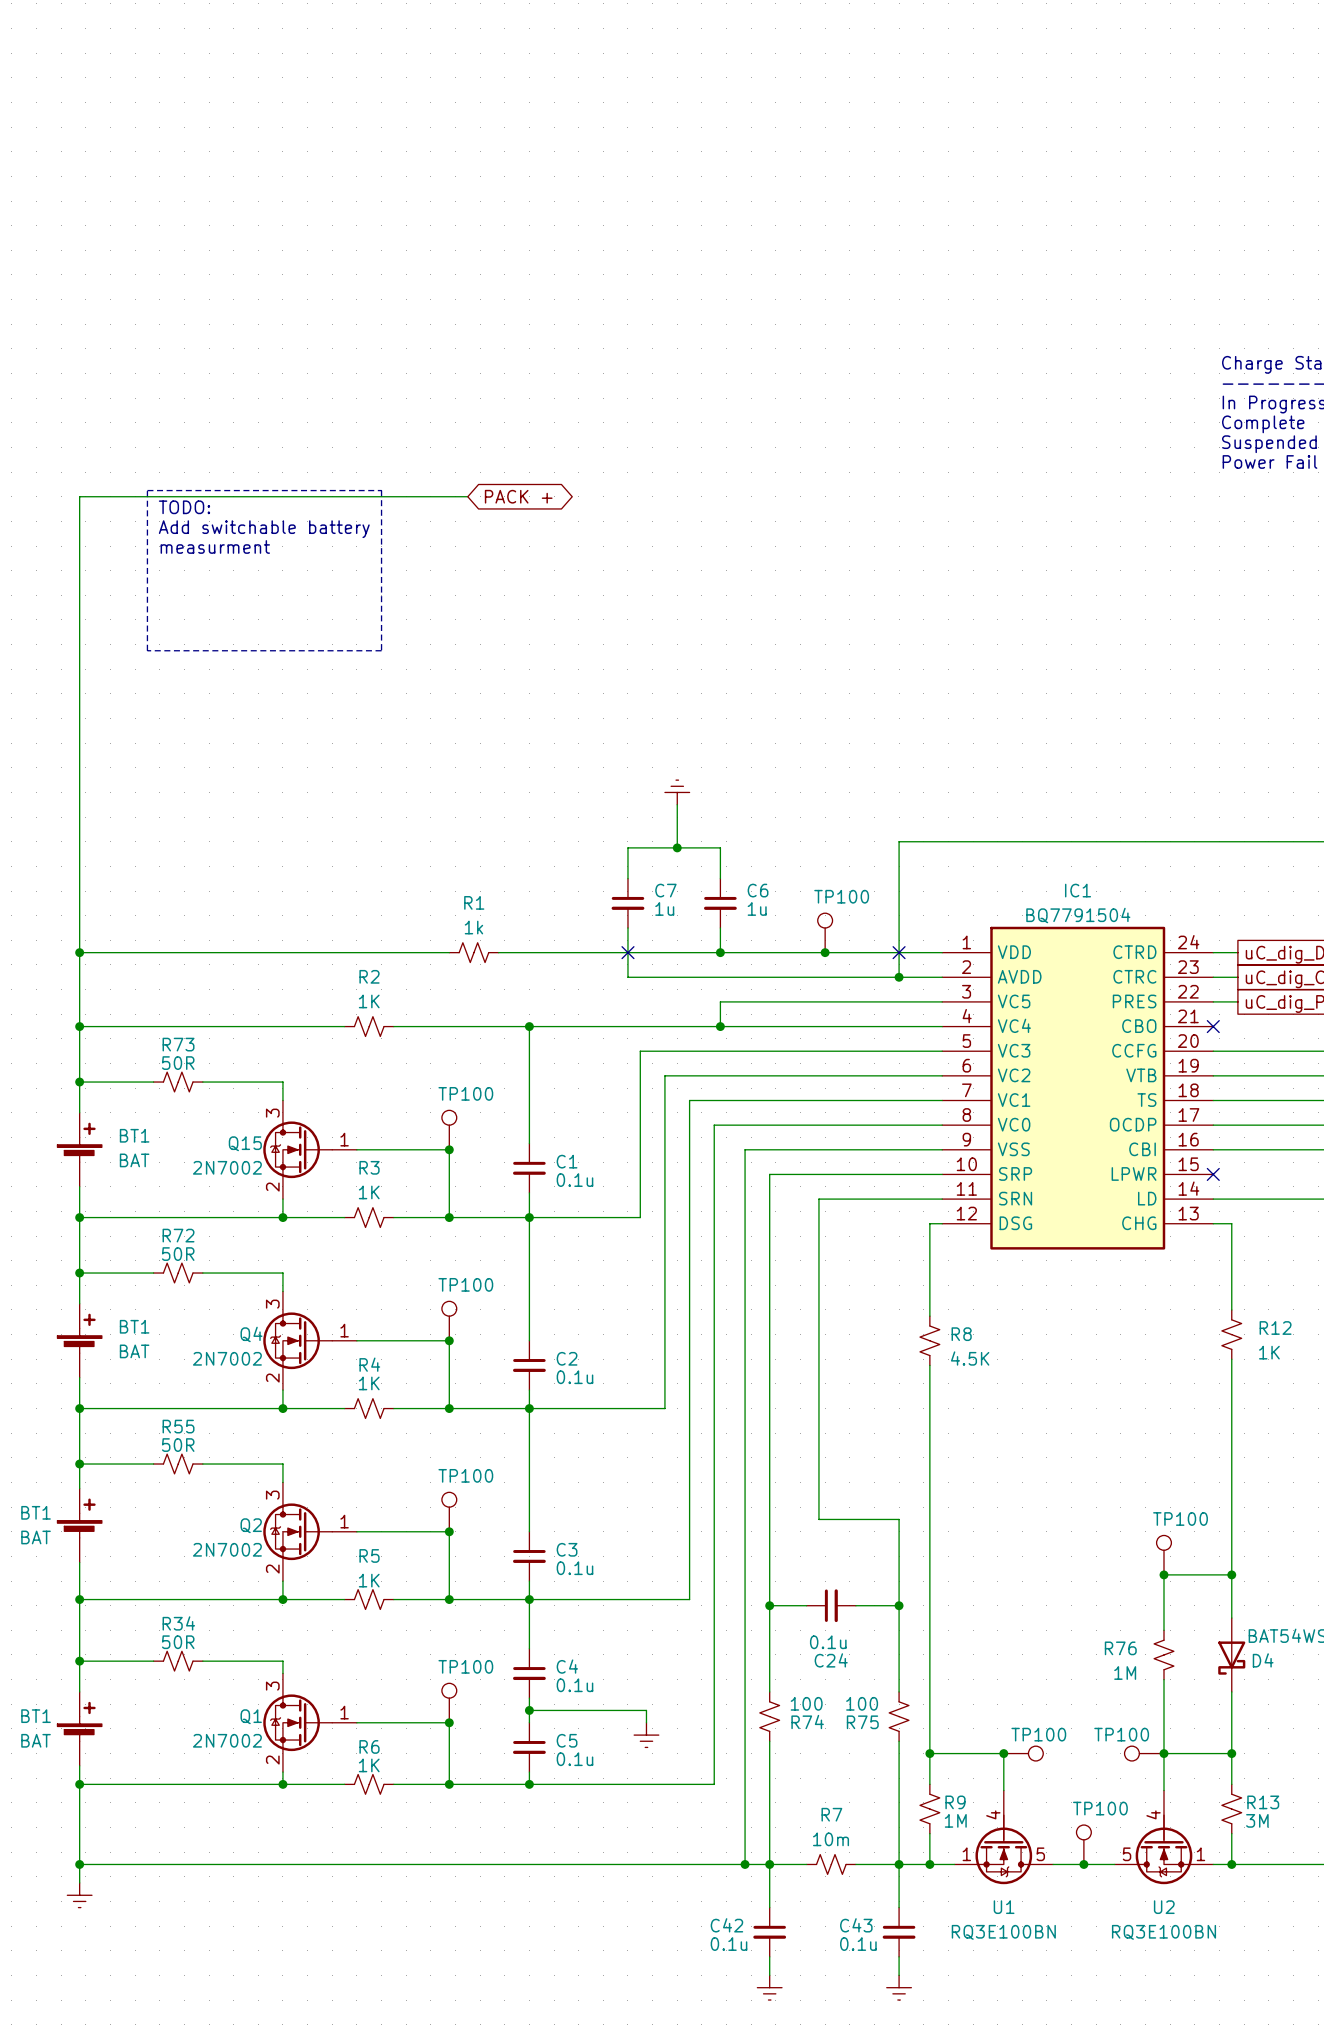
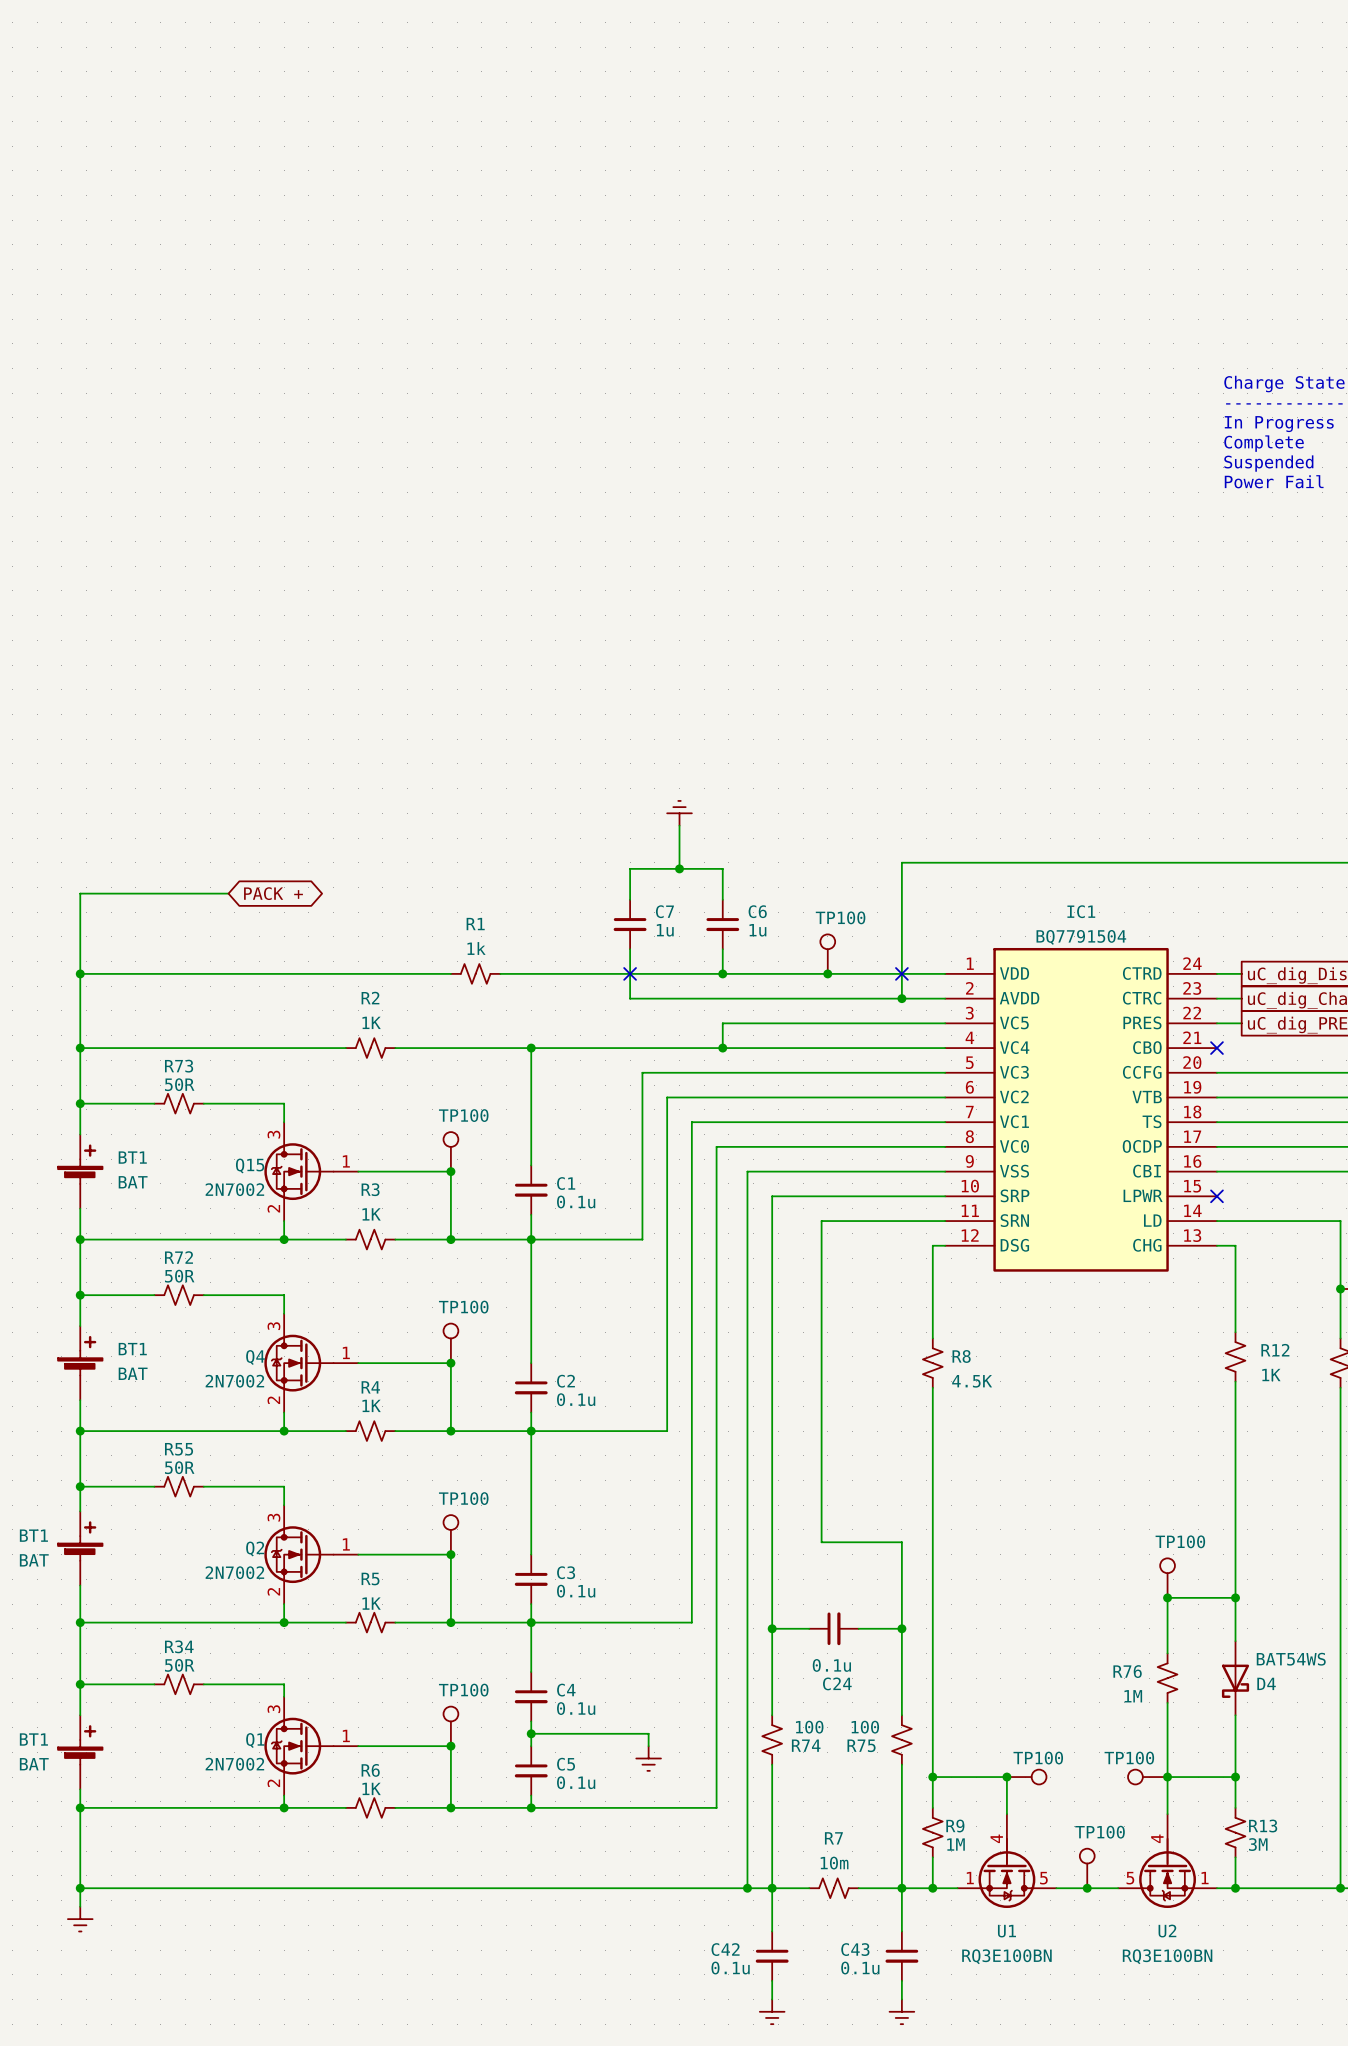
line: (147, 490) (381, 490) (381, 650) (147, 650) (147, 490) -> none
wire: (467, 496) (79, 496) (79, 872) -> (228, 893) (80, 893)
global label: PACK + (518, 496) -> none
text: TODO: (184, 507) -> none
text: Add switchable battery (264, 529) -> none
text: measurment (215, 546) -> none
global label: none -> PACK + (273, 893)

